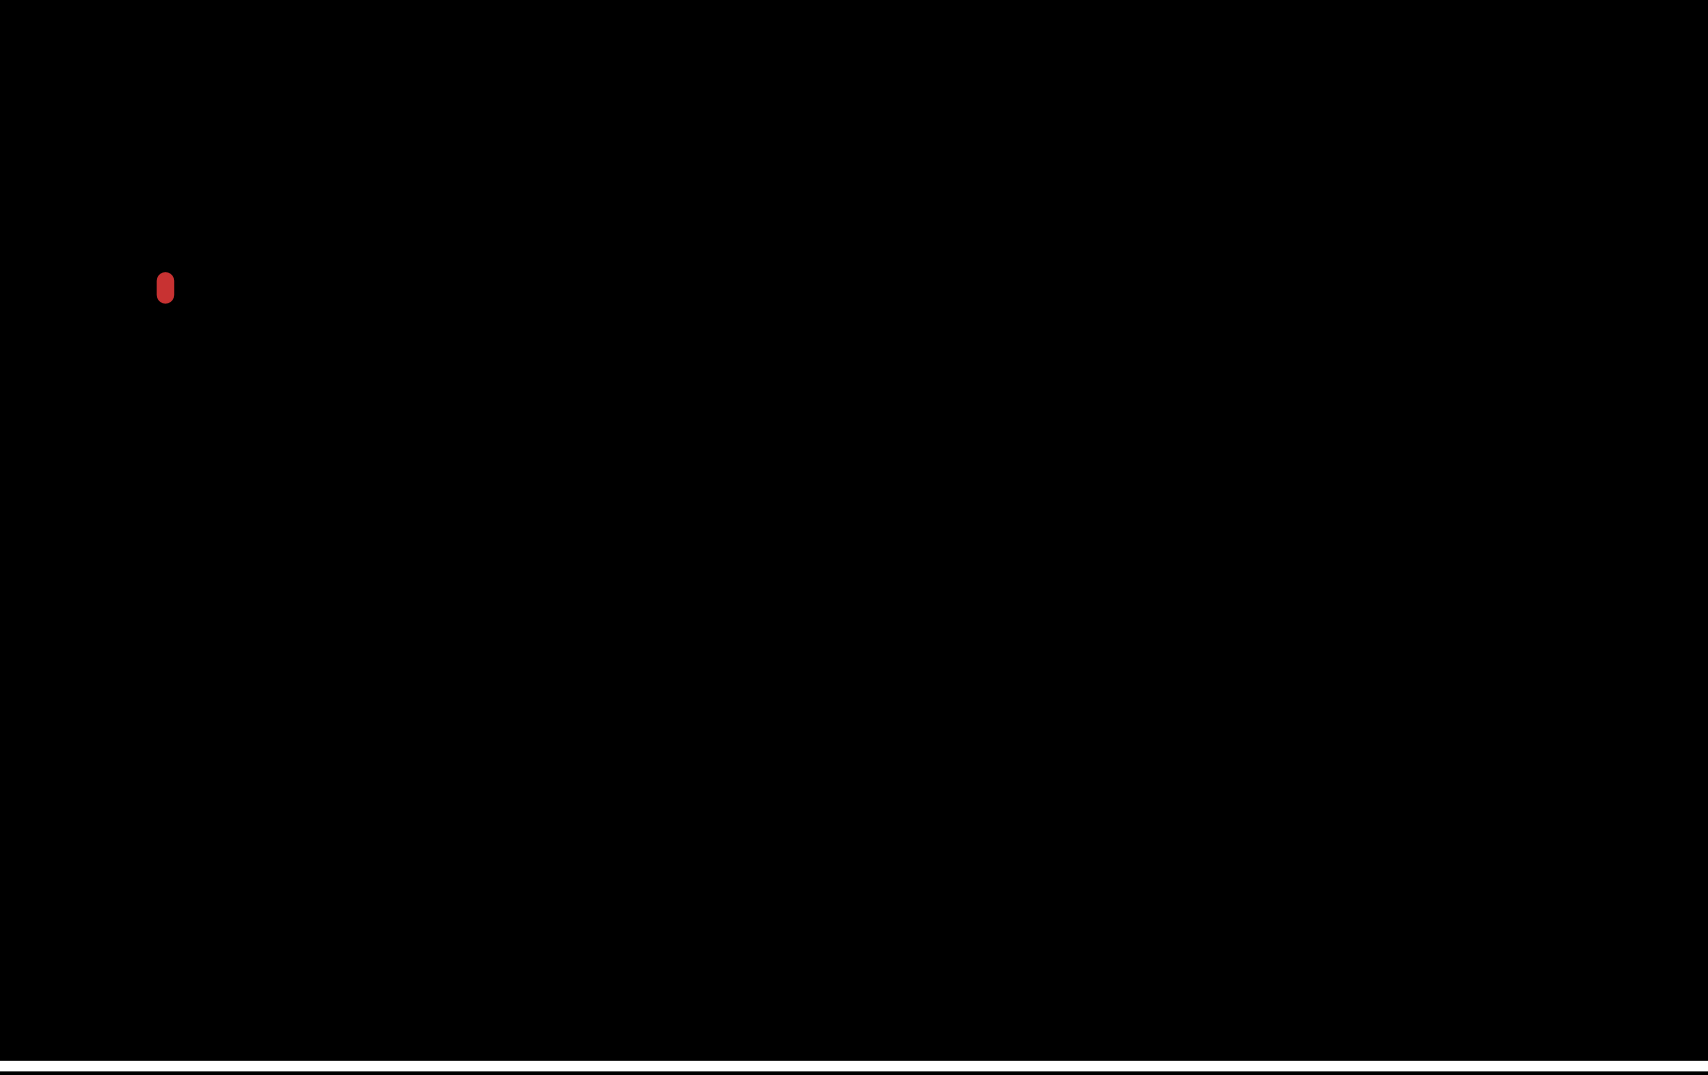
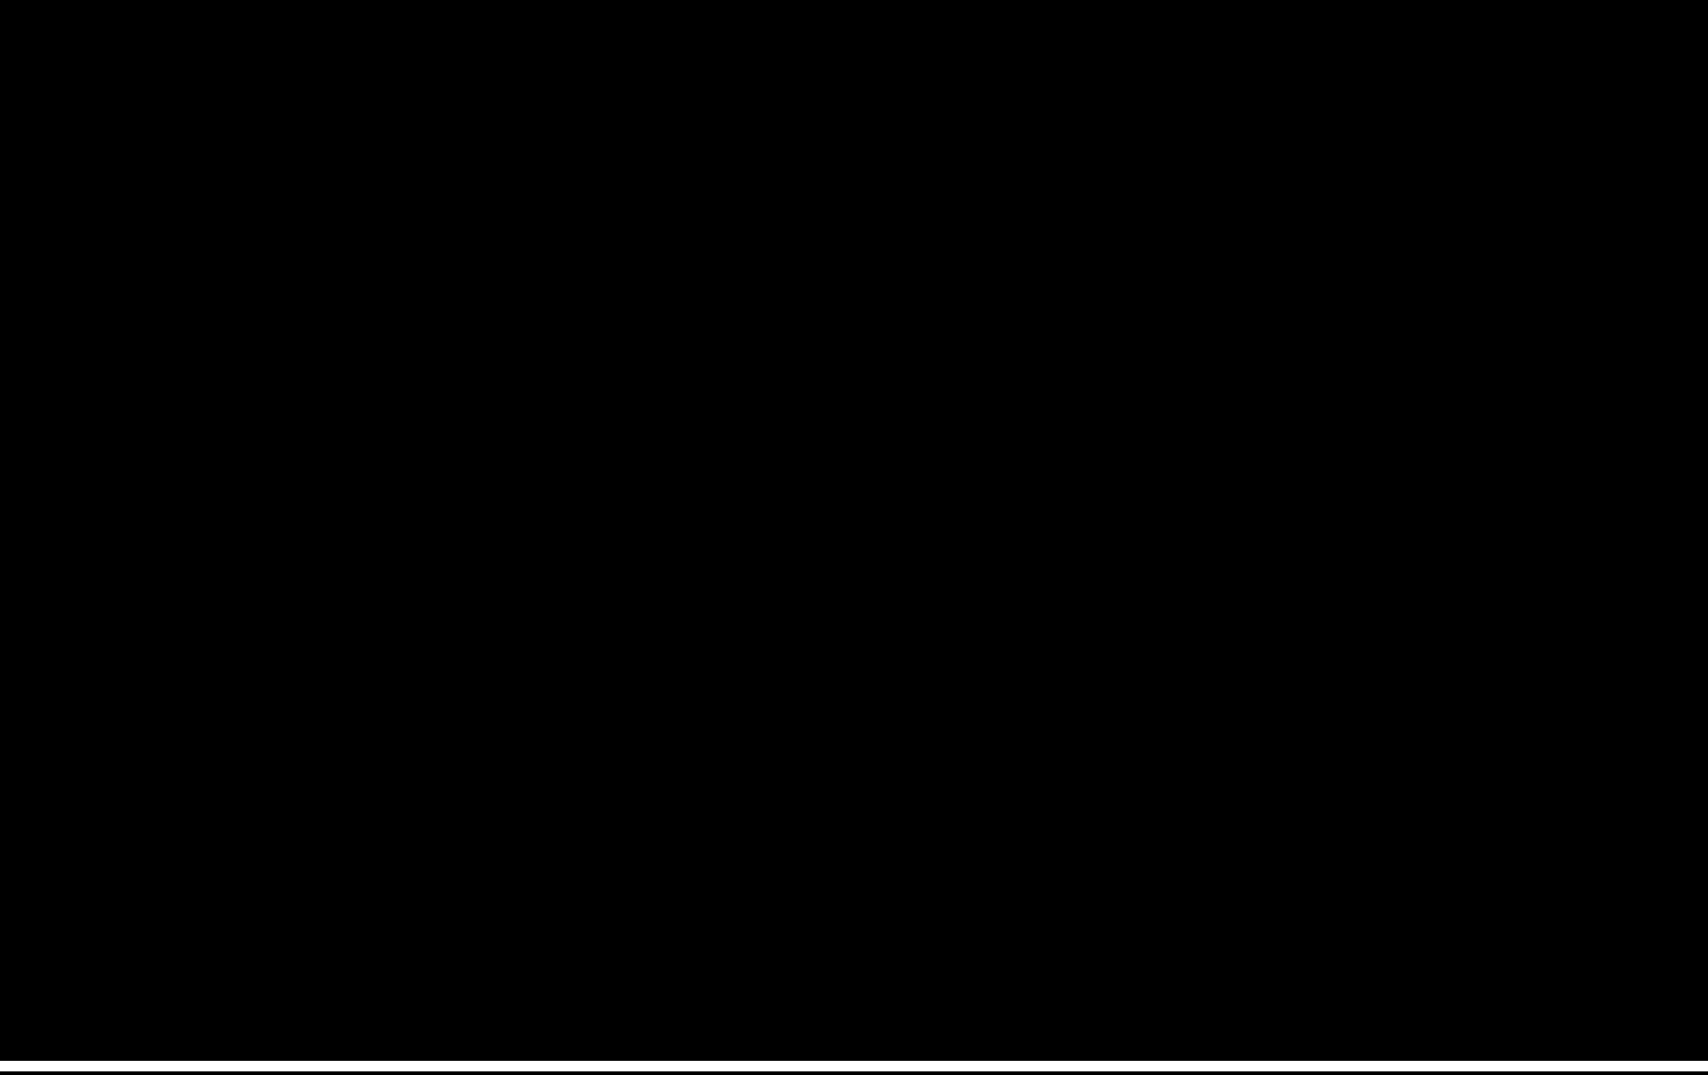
track: (165, 280) (165, 294) -> none

